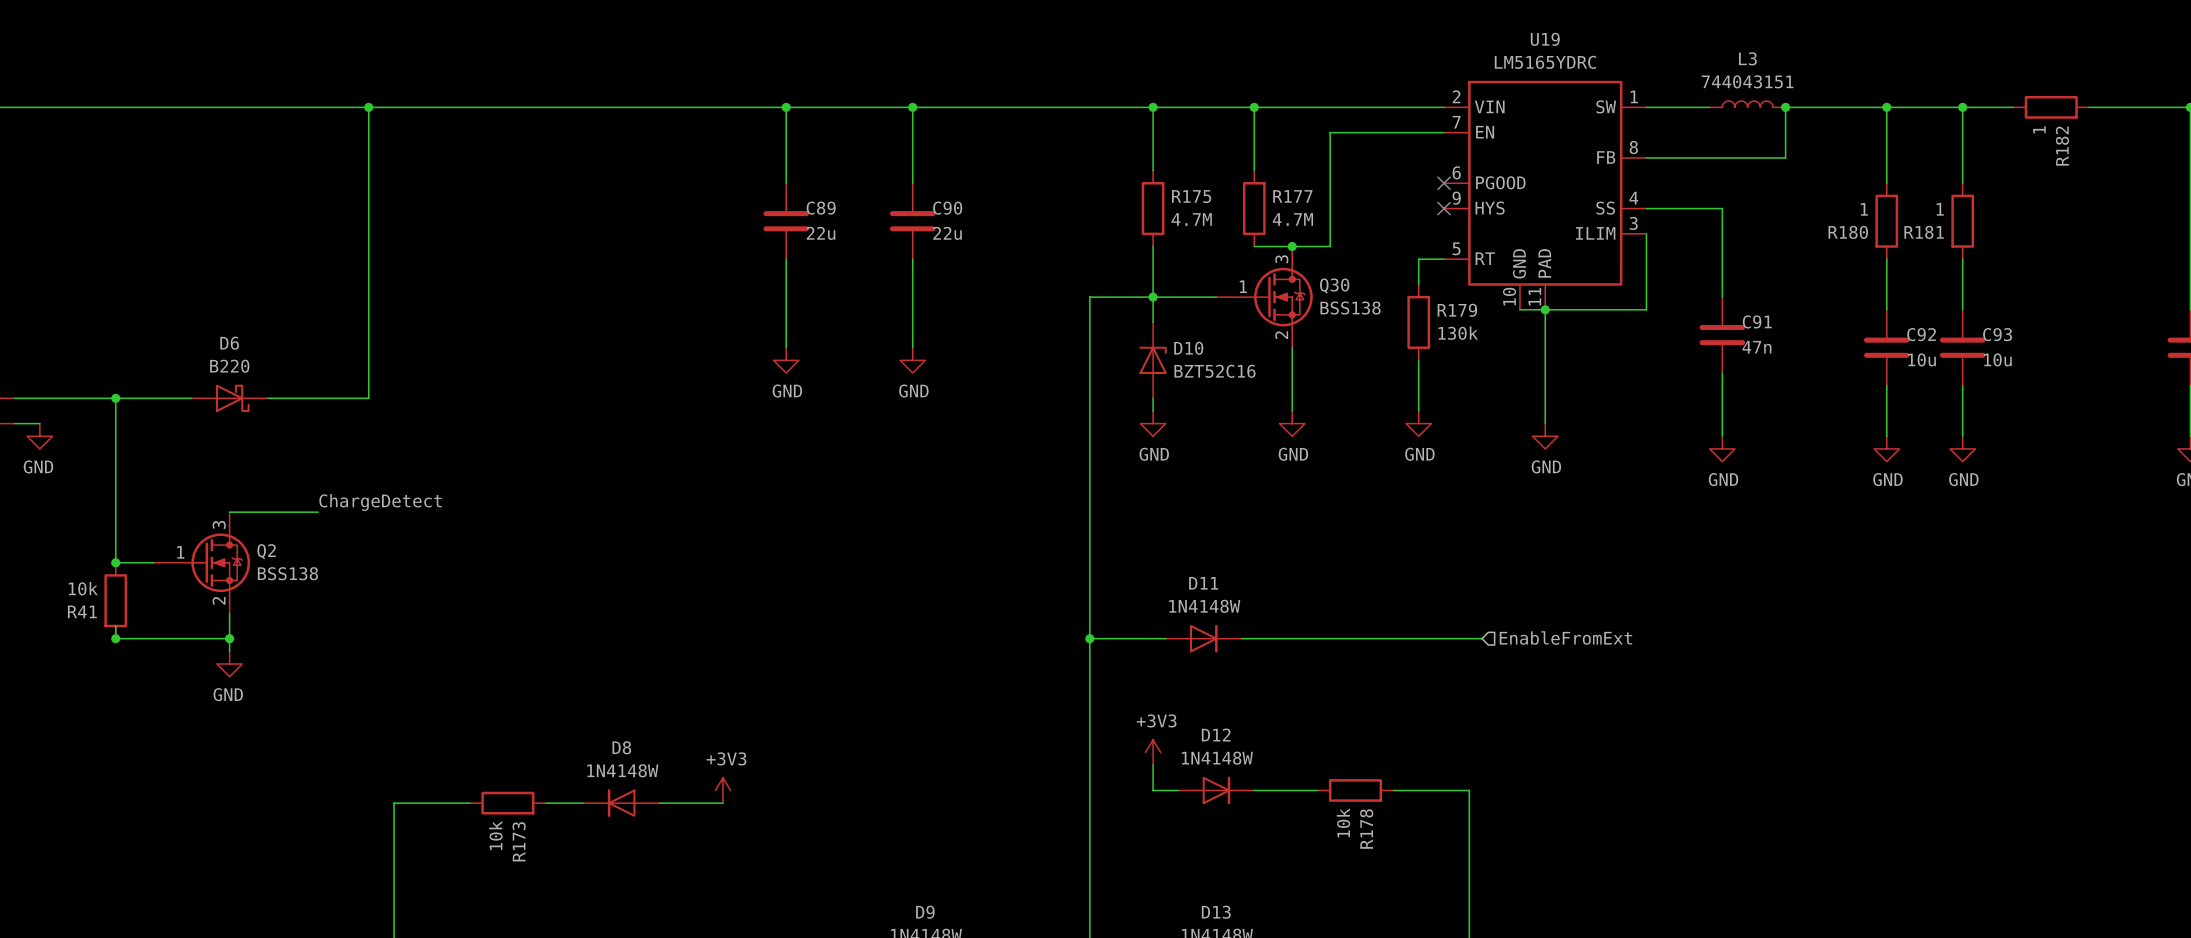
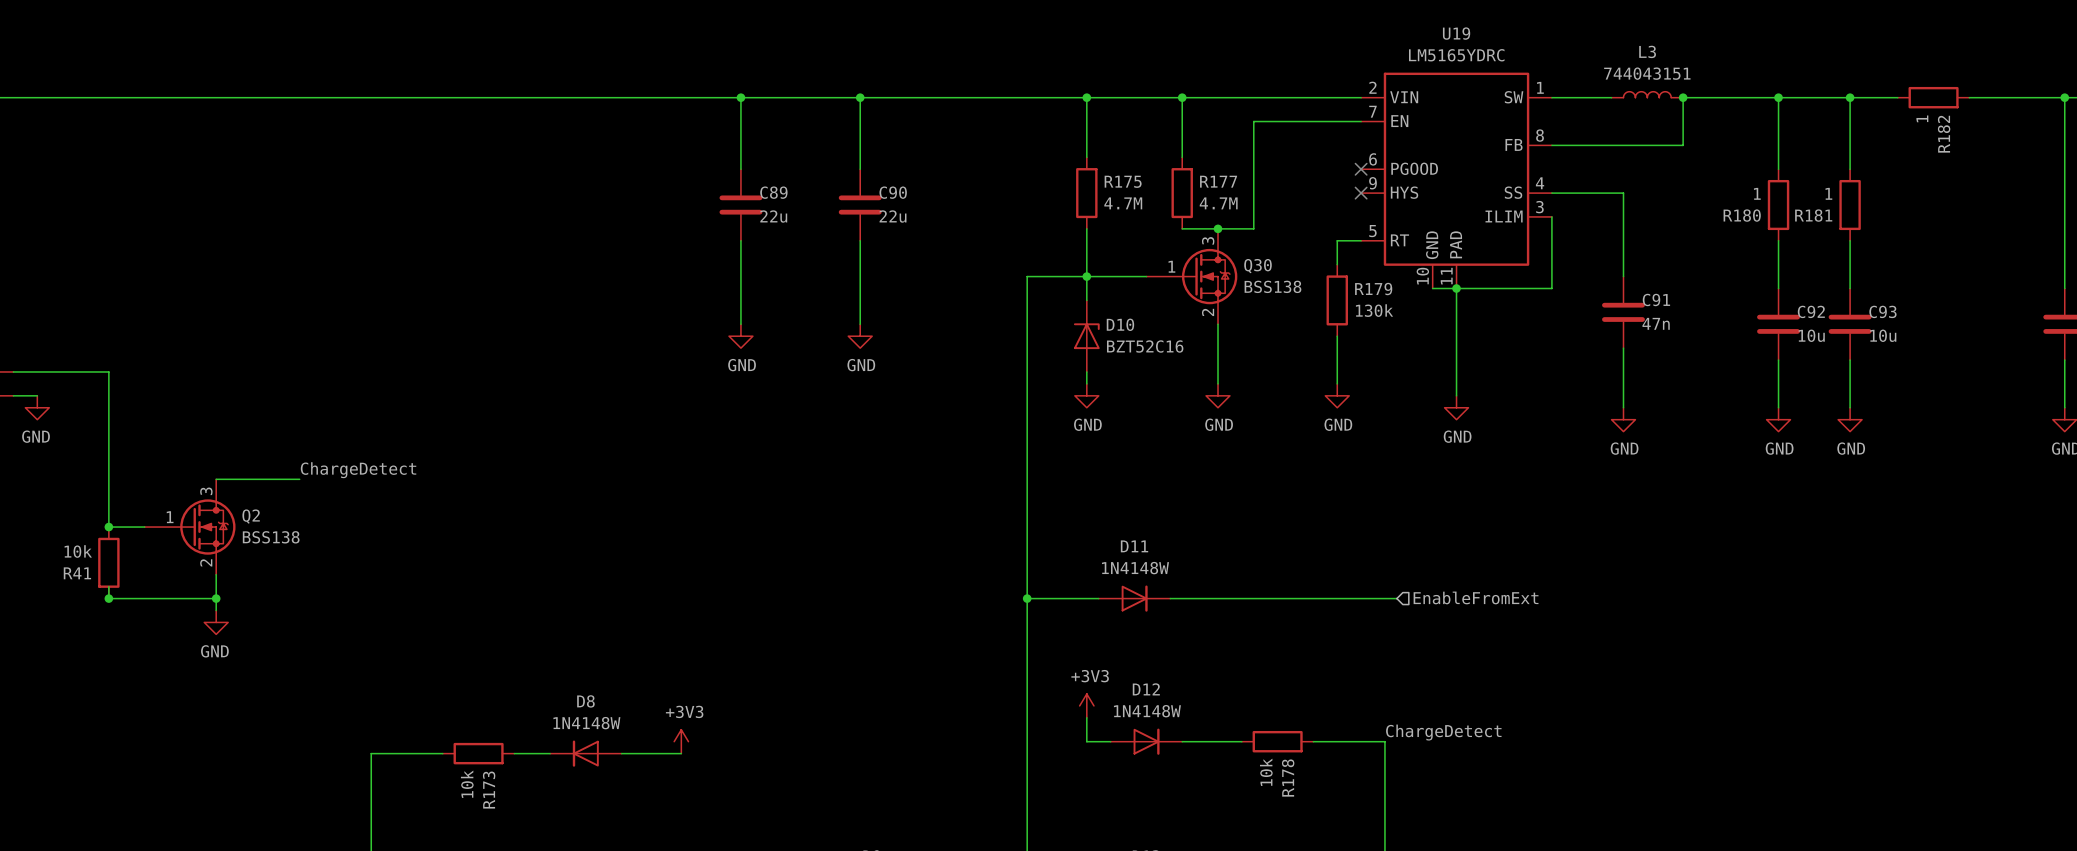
wire: (368, 107) (368, 398) (267, 398) -> none
junction: (368, 107) -> none
wire: (115, 398) (191, 398) -> none
junction: (115, 398) -> none
D6: B220 (229, 398) -> none
label: none -> ChargeDetect (1443, 732)

